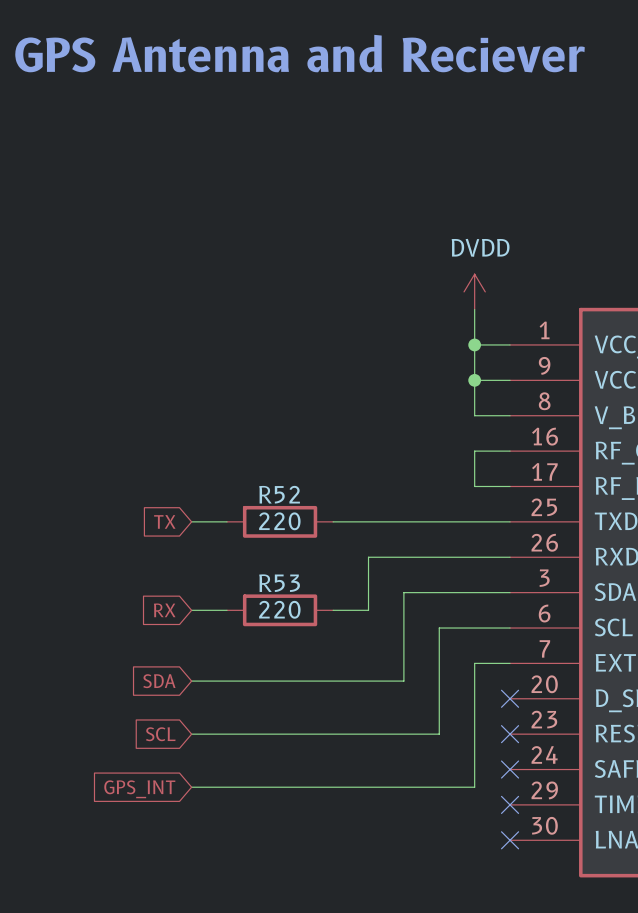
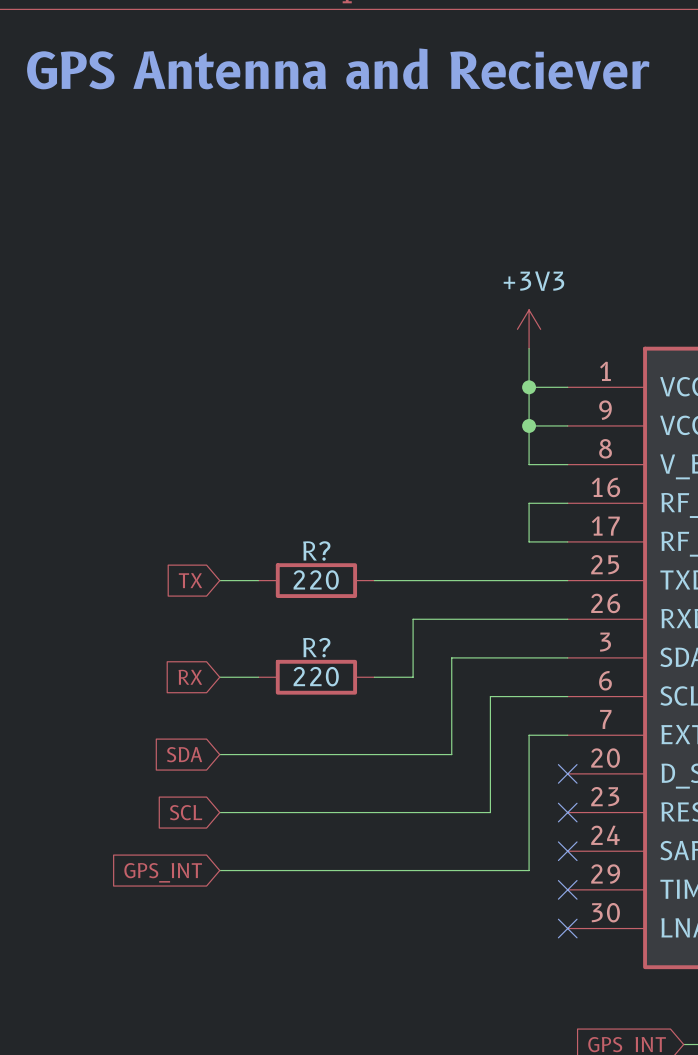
power symbol: DVDD (474, 291) -> +3V3 (529, 329)
R52 name: R52 (279, 494) -> R? (316, 550)
R53 name: R53 (279, 583) -> R? (316, 647)

